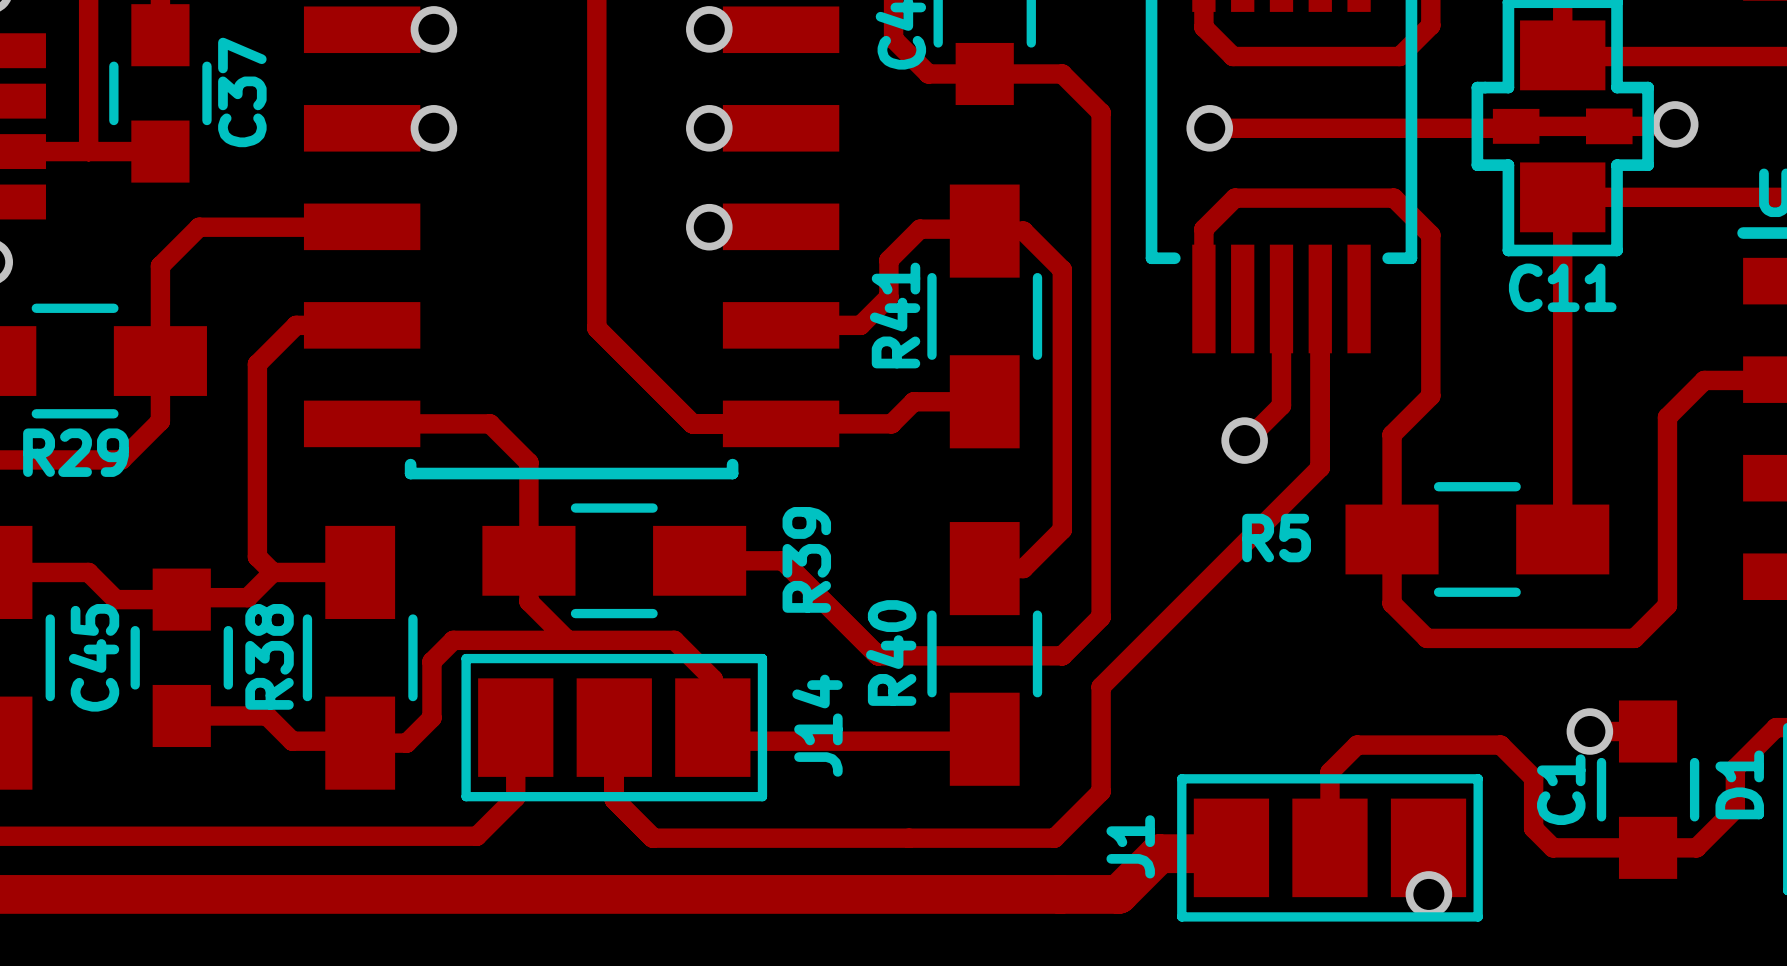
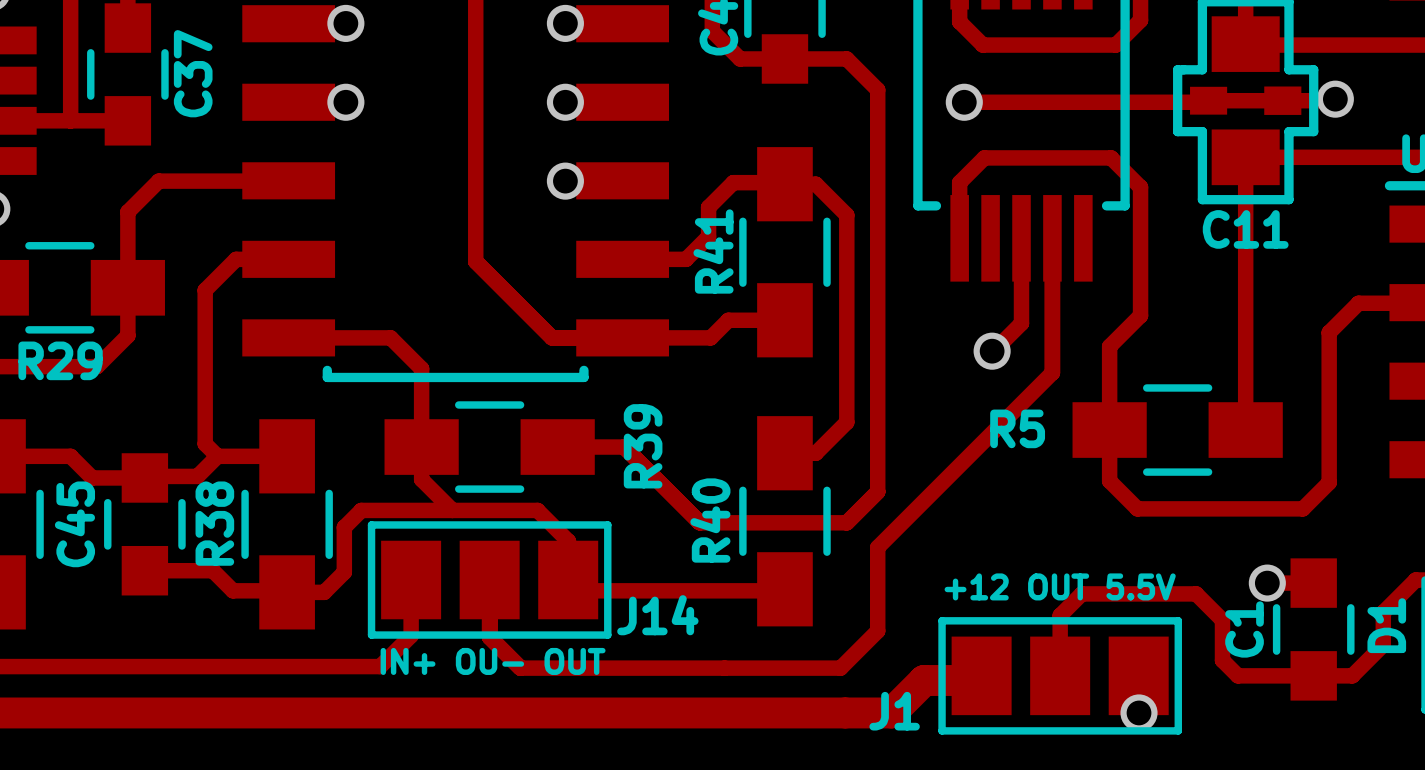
J14 name rotation: 0° (817, 725) -> 90° clockwise (657, 615)
text: none -> +12 OUT 5.5V (1060, 586)
text: none -> IN+ OU- OUT (493, 661)
J1 name rotation: 0° (1130, 846) -> 90° clockwise (894, 711)

